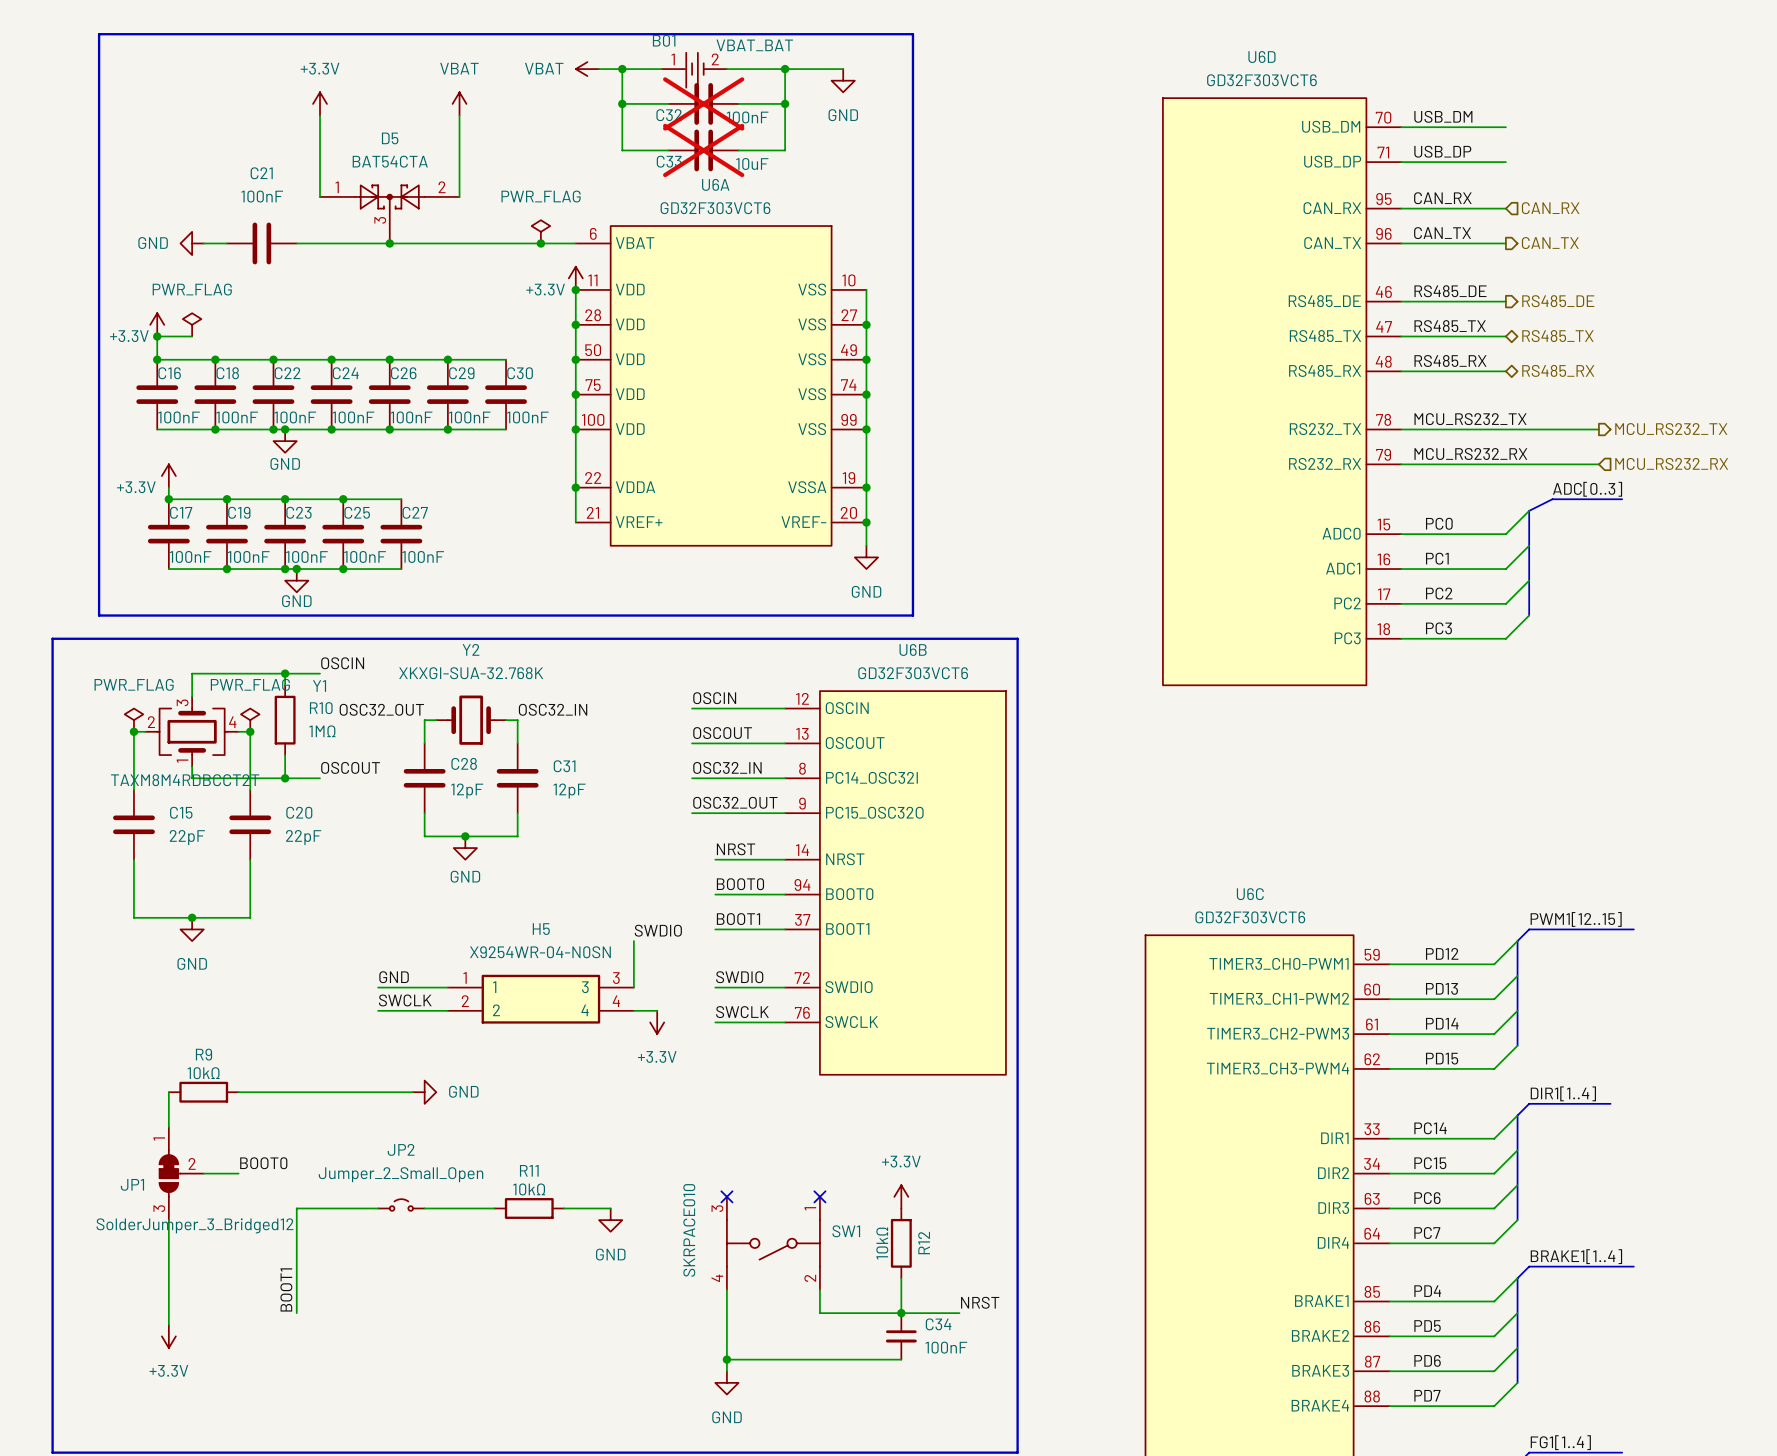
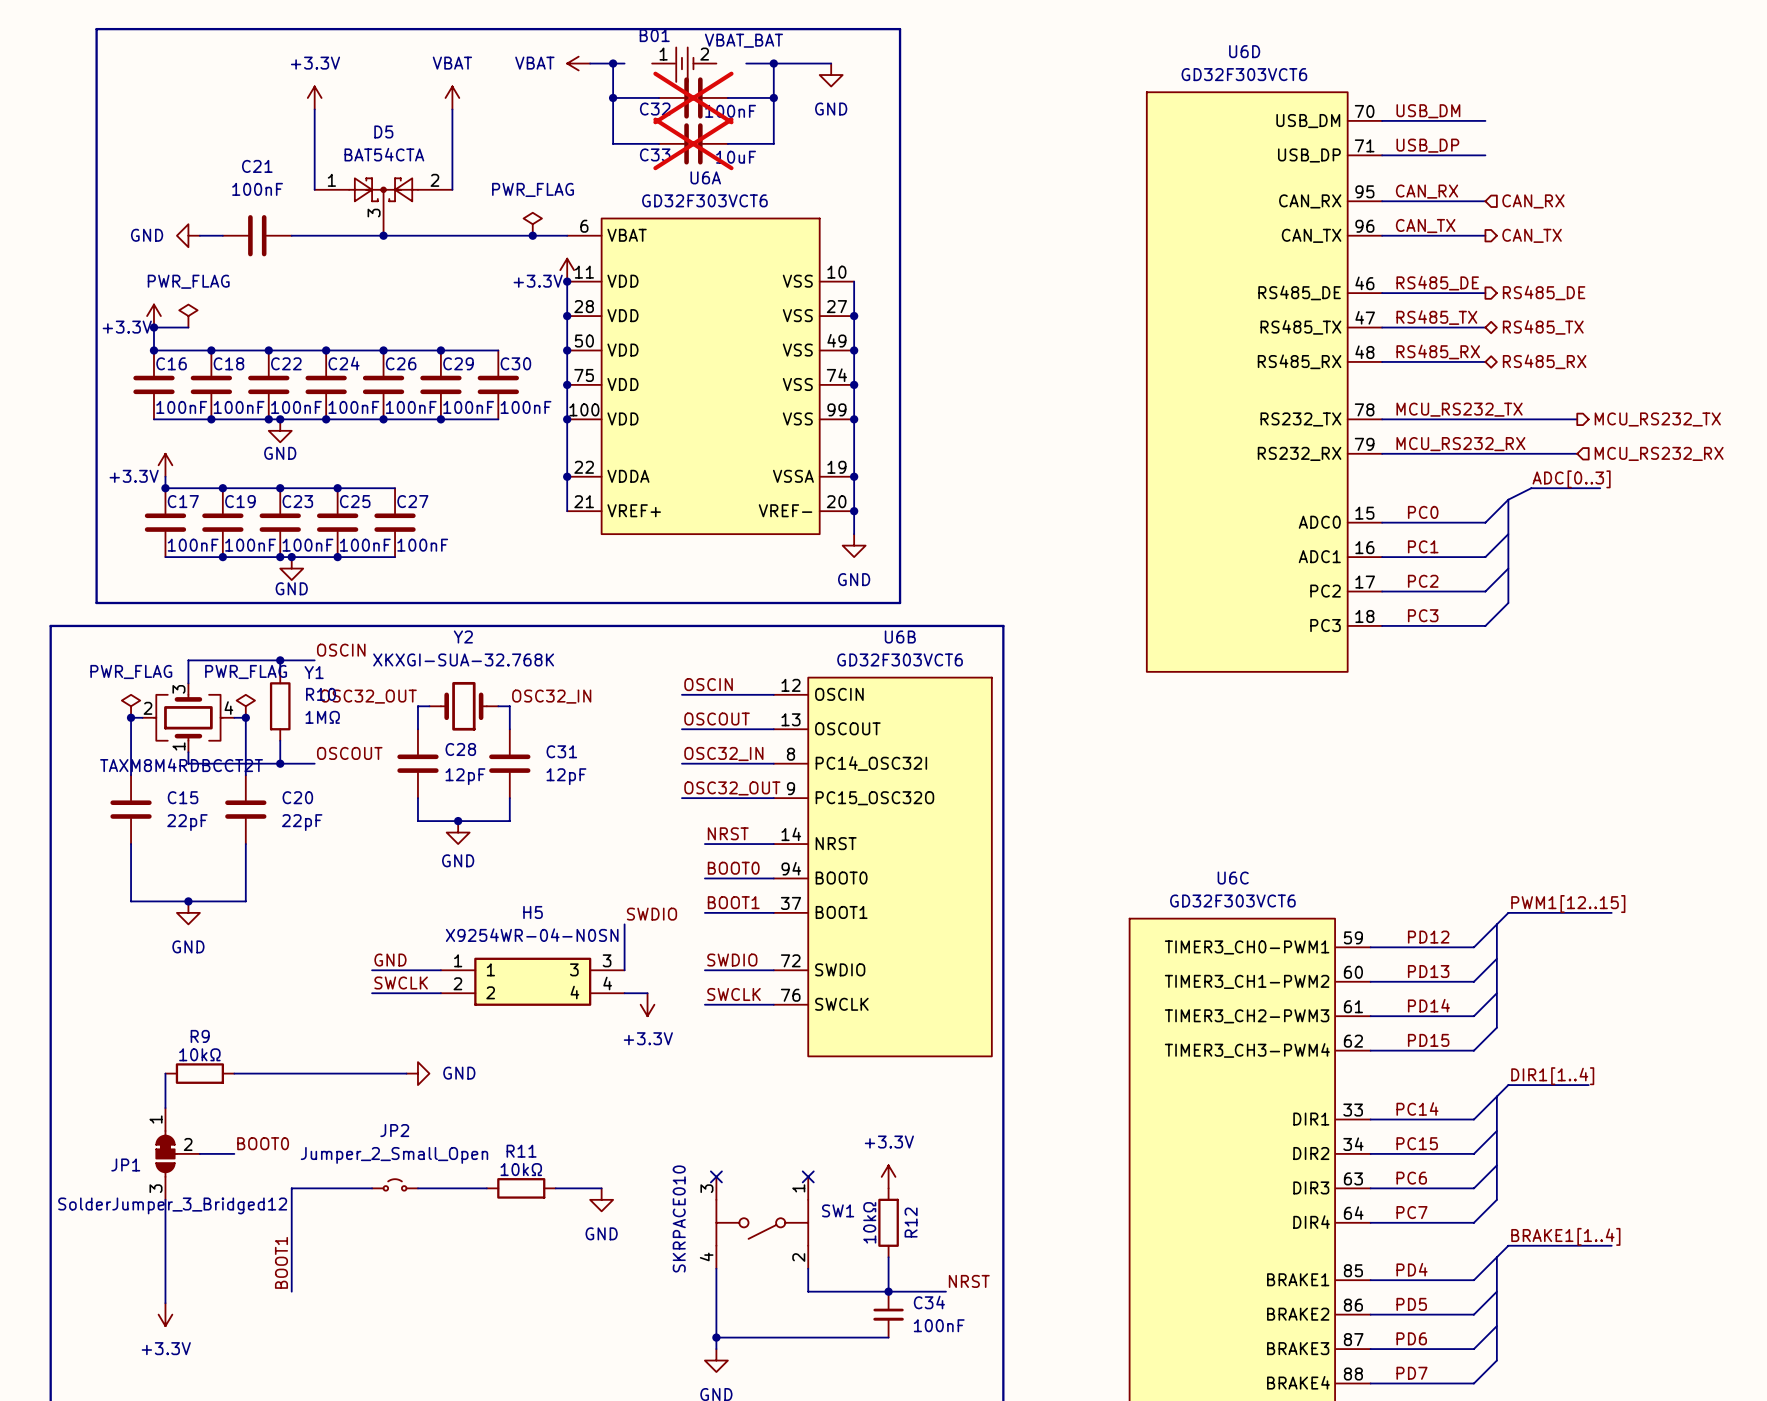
wire: (633, 69) (661, 69) -> none
wire: (726, 69) (757, 69) -> none

